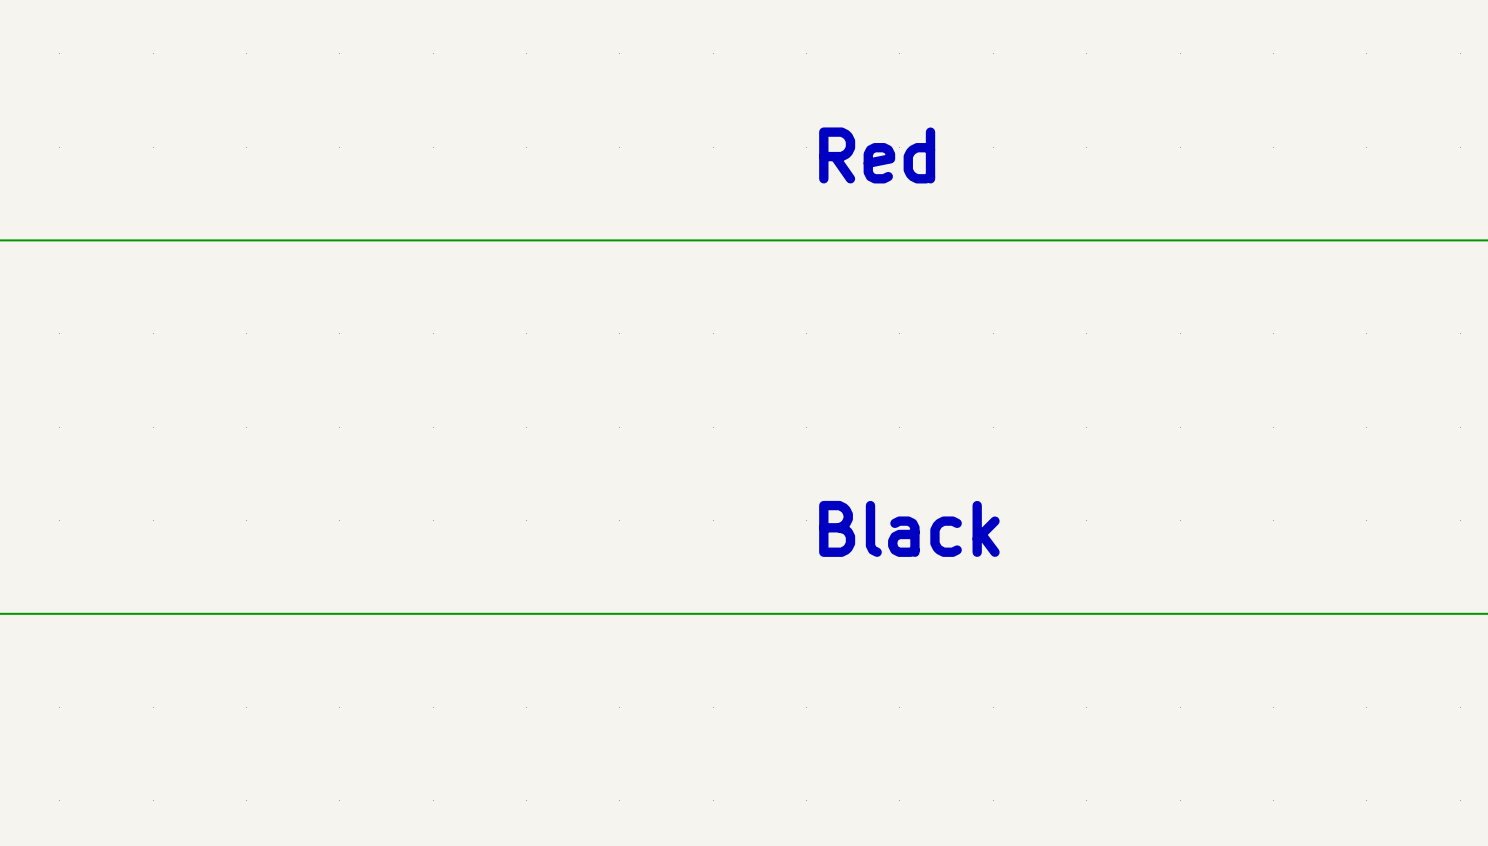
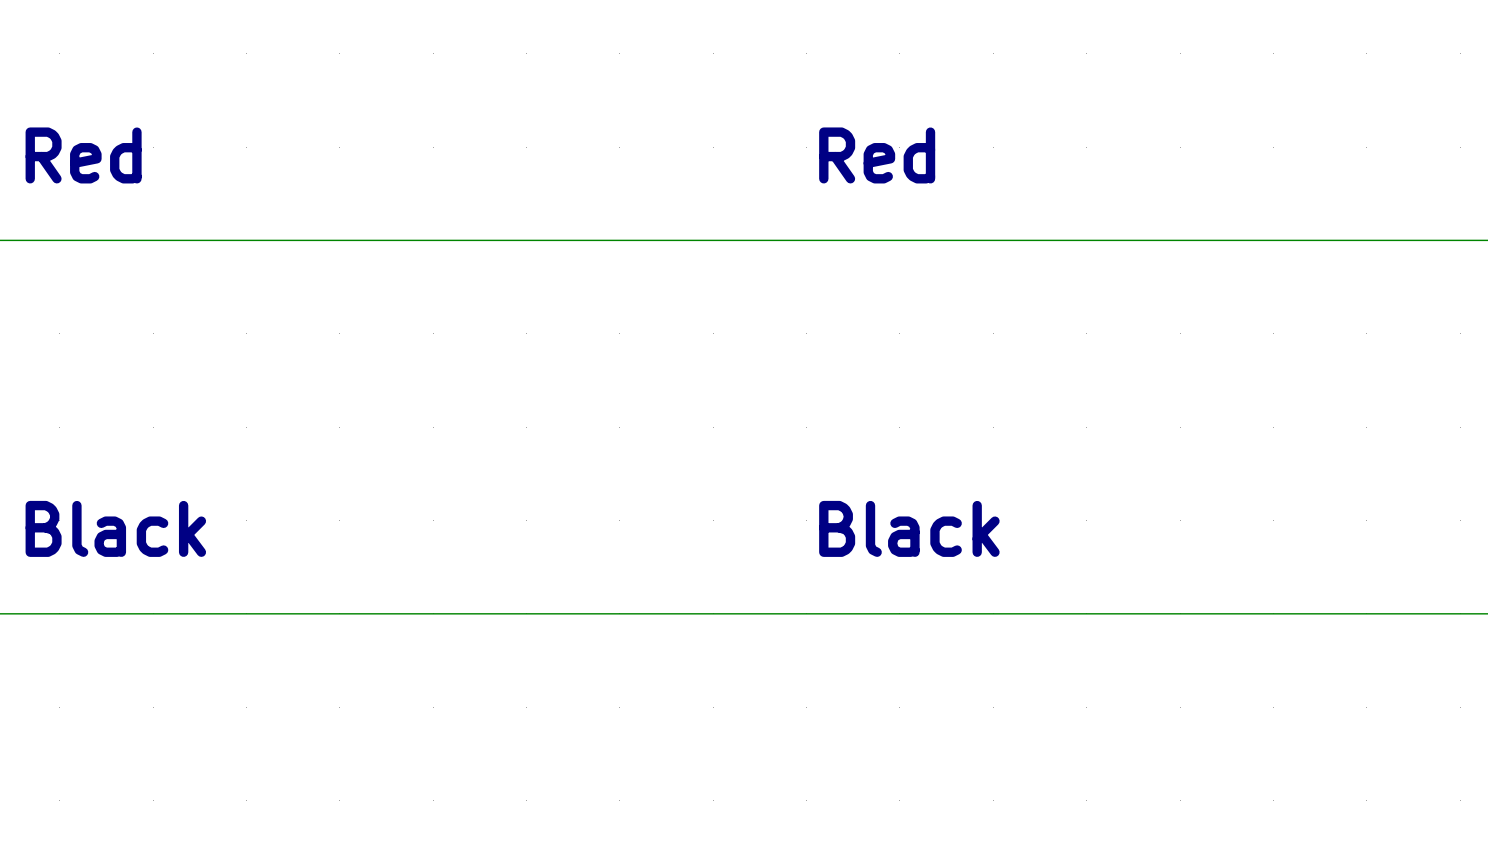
text: none -> Red (83, 155)
text: none -> Black (115, 528)

